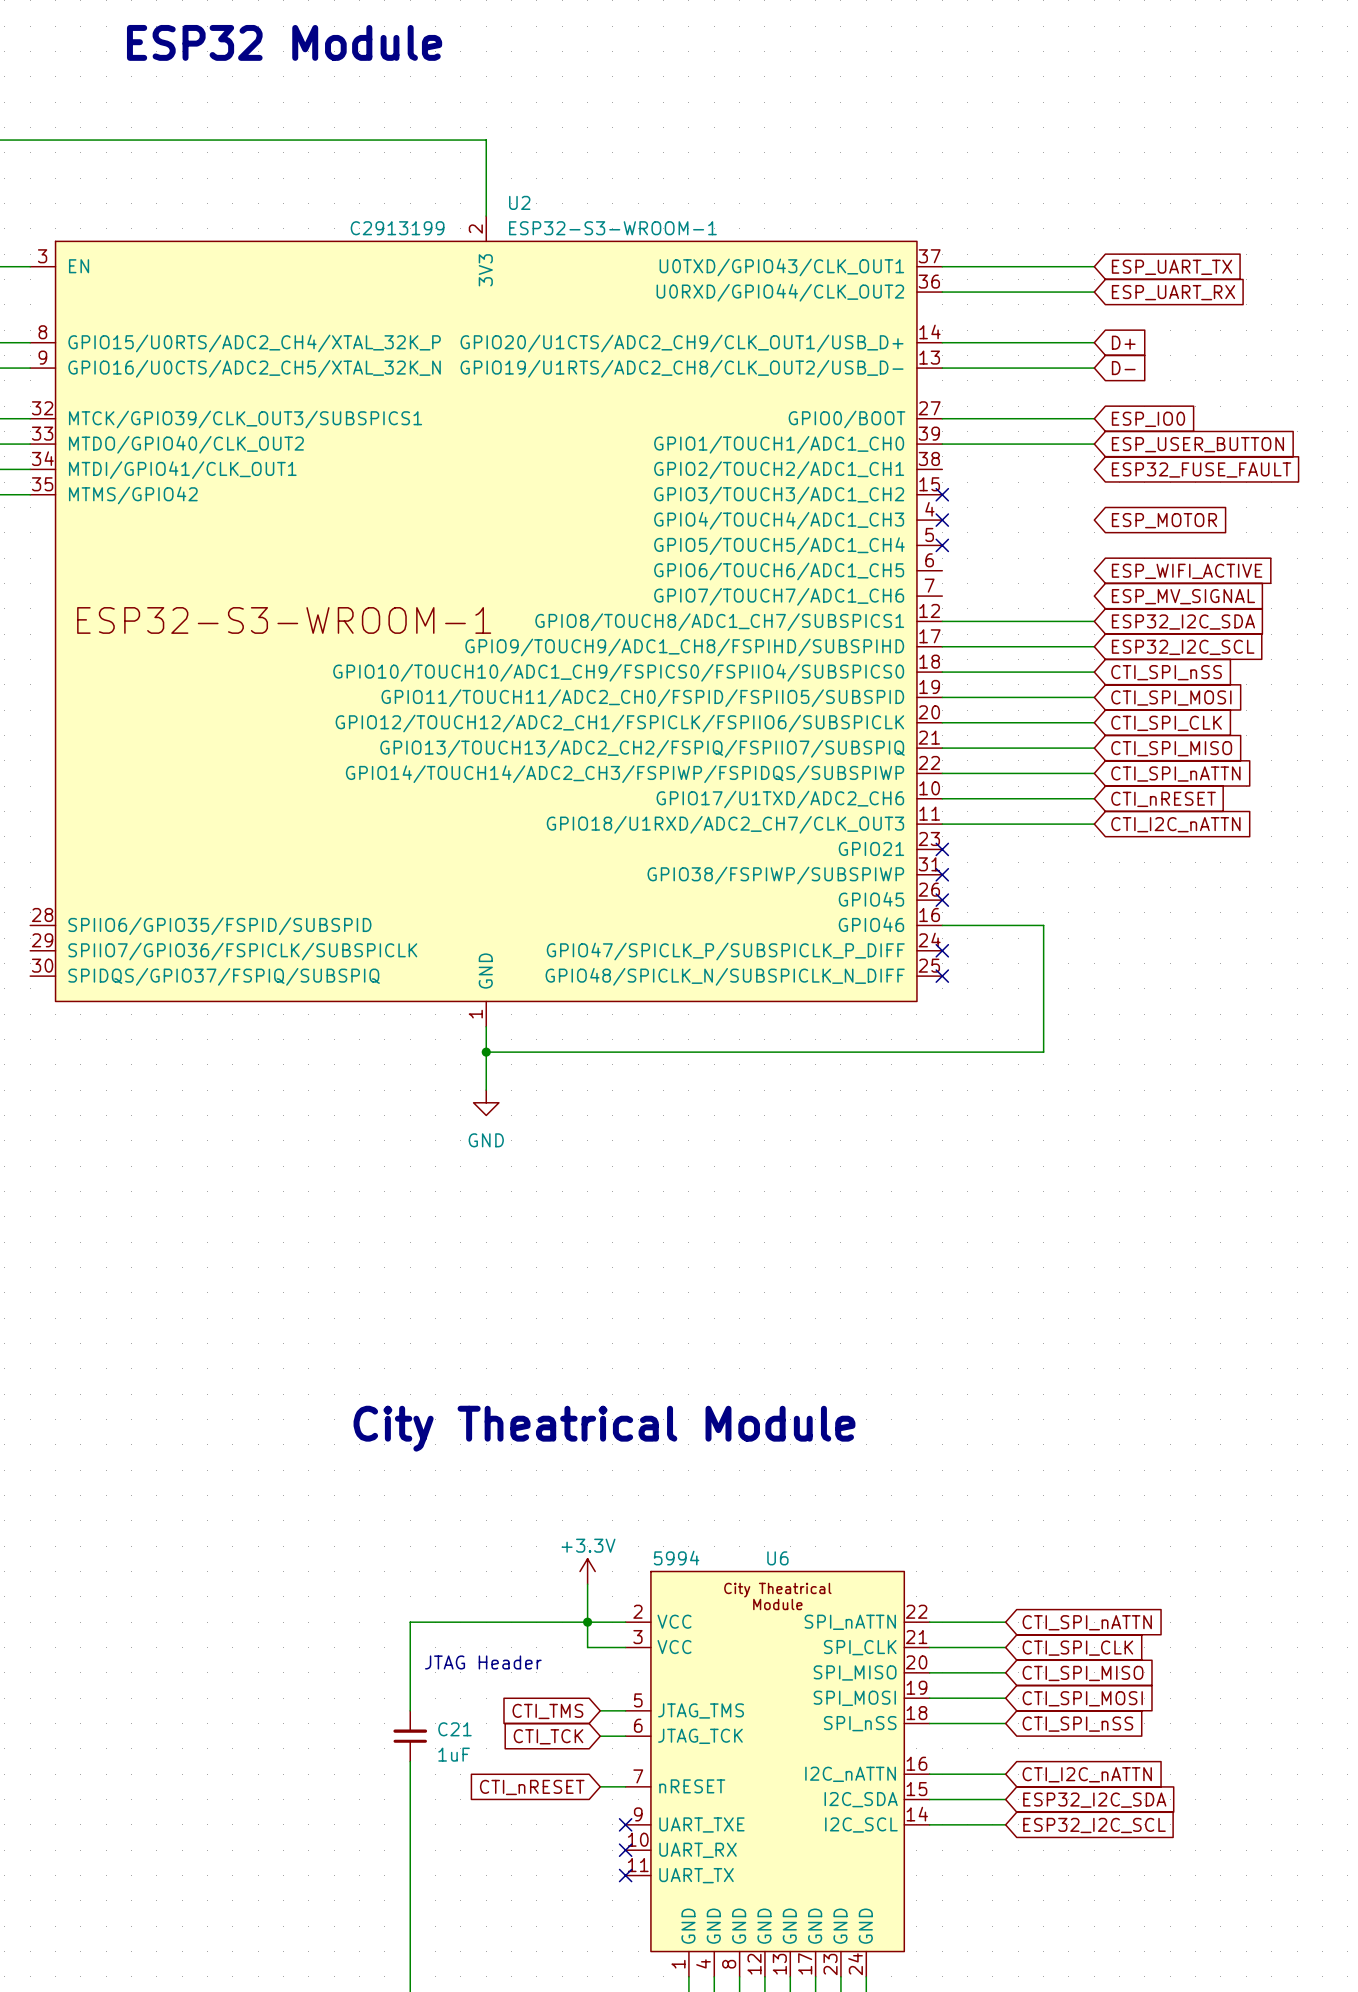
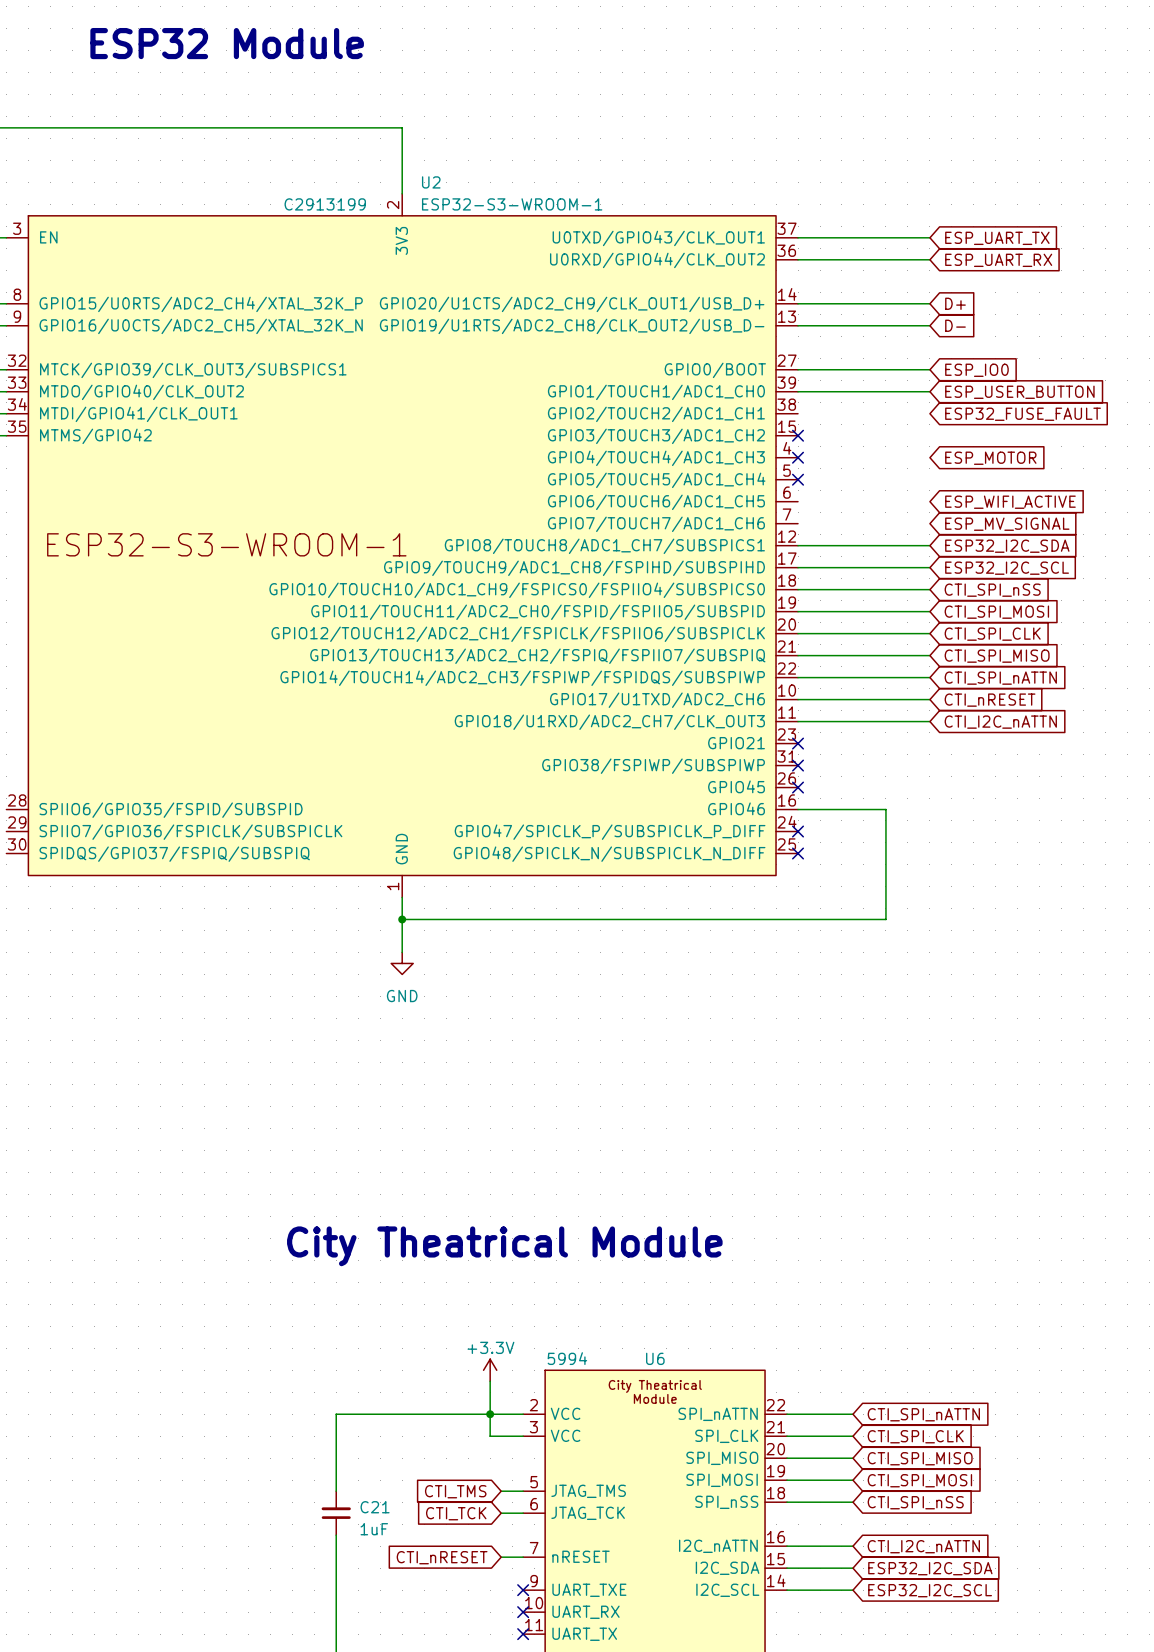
text: JTAG Header (483, 1662) -> none

